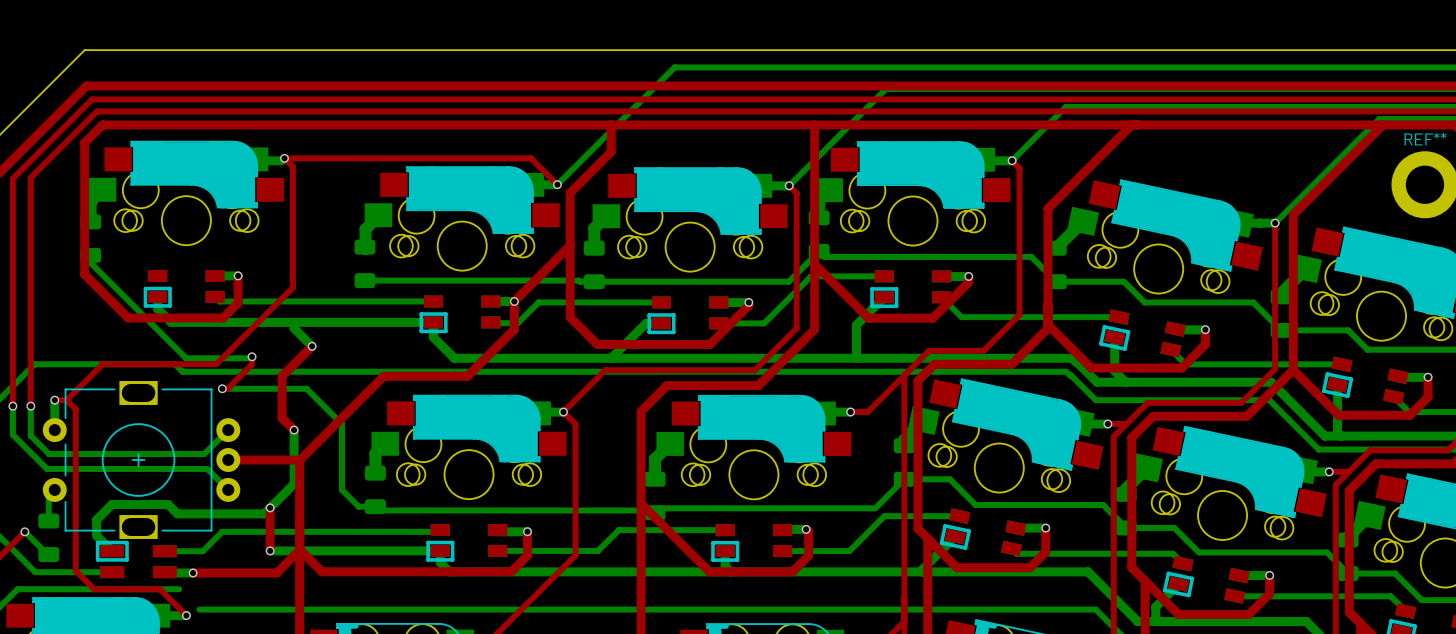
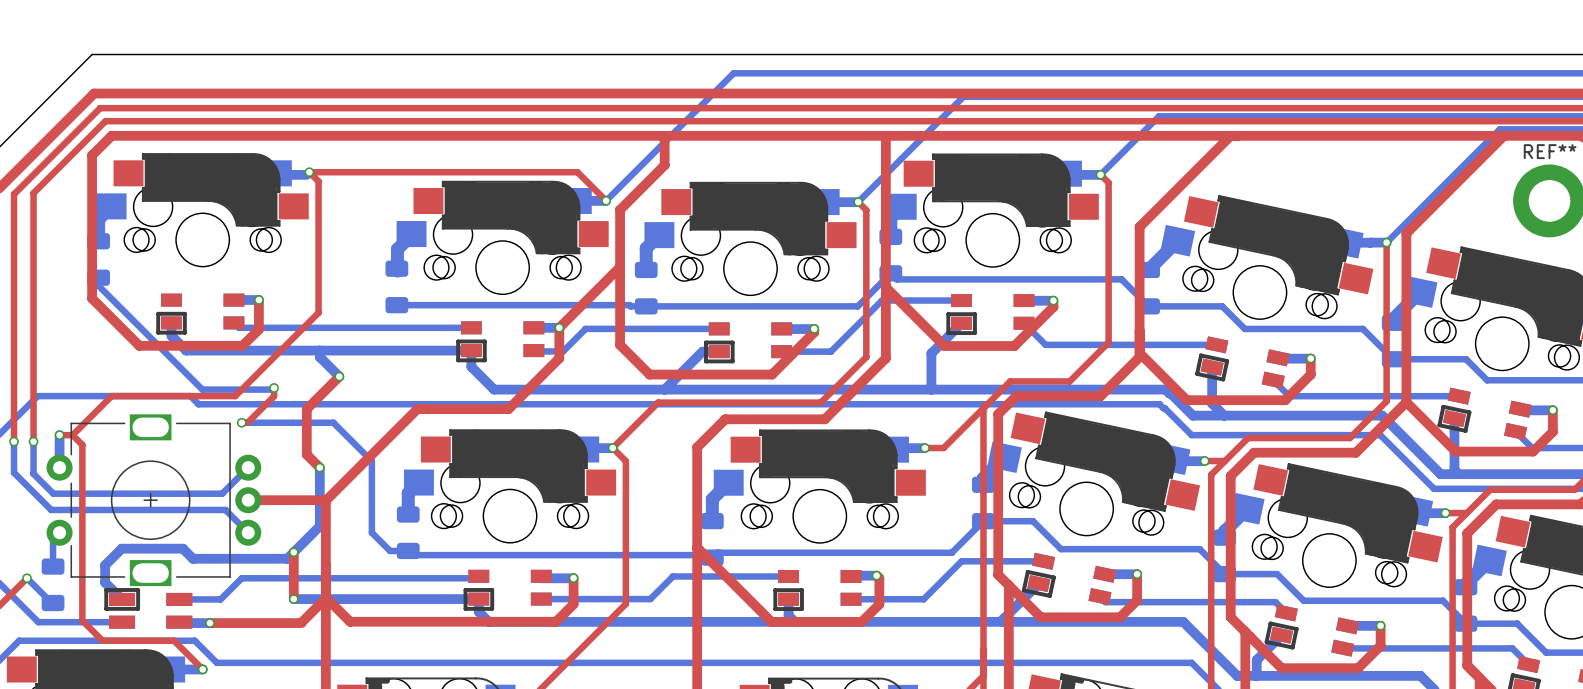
bottom track: none -> (194, 640) (216, 662)

